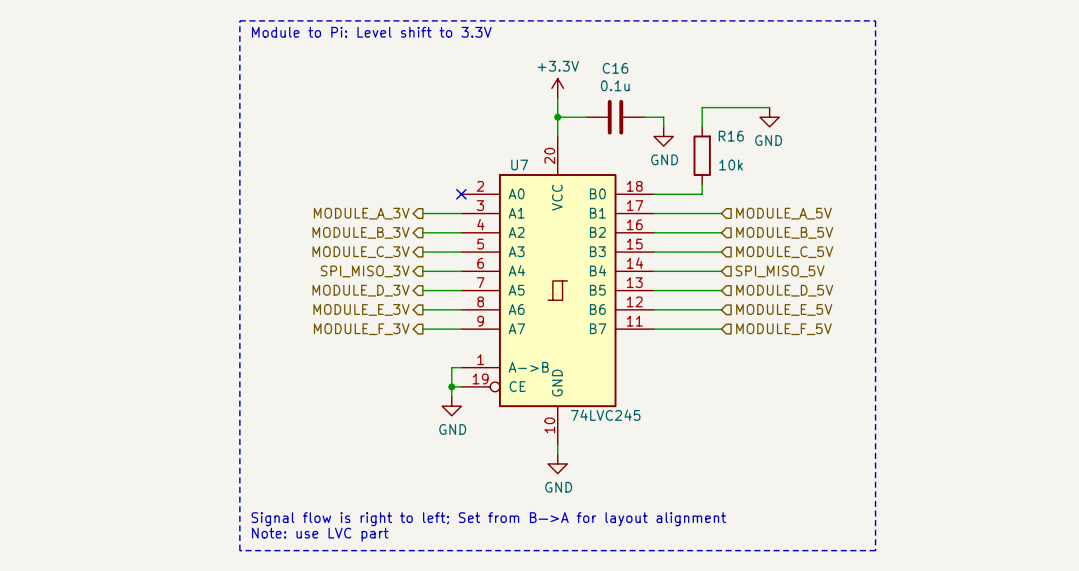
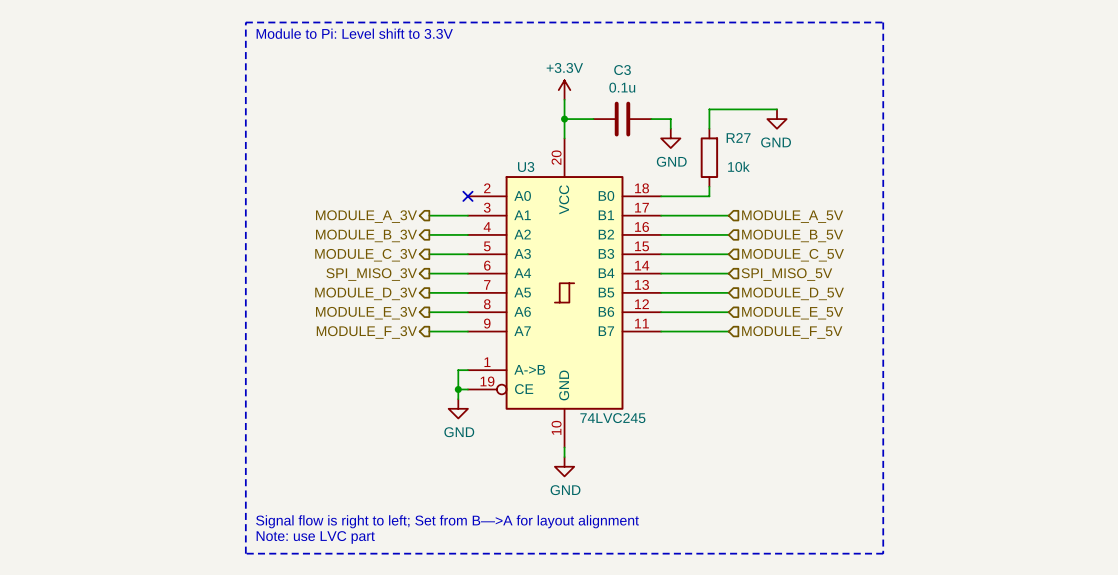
C16 name: C16 (615, 68) -> C3 (622, 70)
R16 name: R16 (731, 136) -> R27 (738, 137)
U7 name: U7 (519, 165) -> U3 (526, 167)

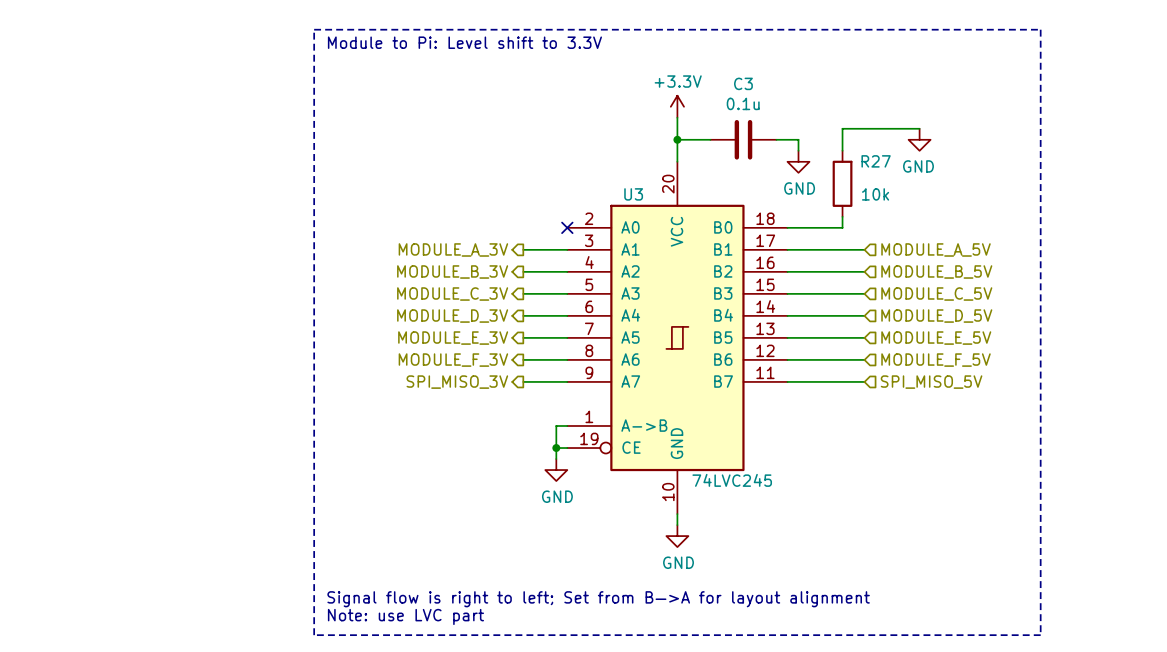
hierarchical label: SPI_MISO_3V (371, 274) -> MODULE_D_3V (452, 316)
hierarchical label: SPI_MISO_5V (786, 274) -> MODULE_D_5V (936, 316)
hierarchical label: MODULE_D_3V (366, 293) -> MODULE_E_3V (453, 338)
hierarchical label: MODULE_D_5V (793, 293) -> MODULE_E_5V (936, 338)
hierarchical label: MODULE_E_3V (366, 313) -> MODULE_F_3V (453, 360)
hierarchical label: MODULE_E_5V (792, 313) -> MODULE_F_5V (936, 360)
hierarchical label: MODULE_F_3V (366, 332) -> SPI_MISO_3V (457, 382)
hierarchical label: MODULE_F_5V (792, 332) -> SPI_MISO_5V (931, 382)

